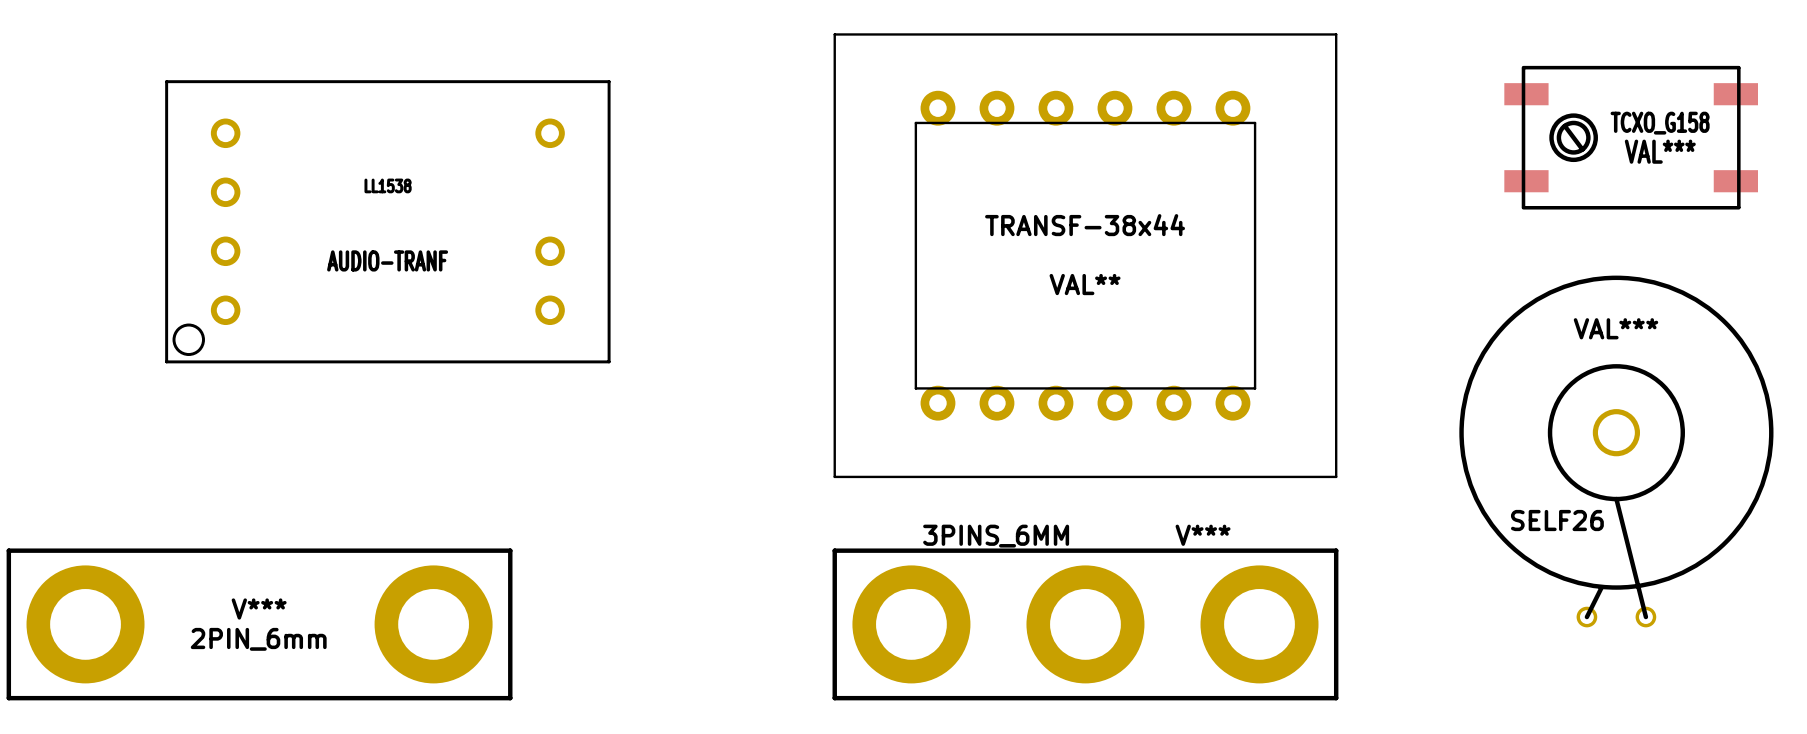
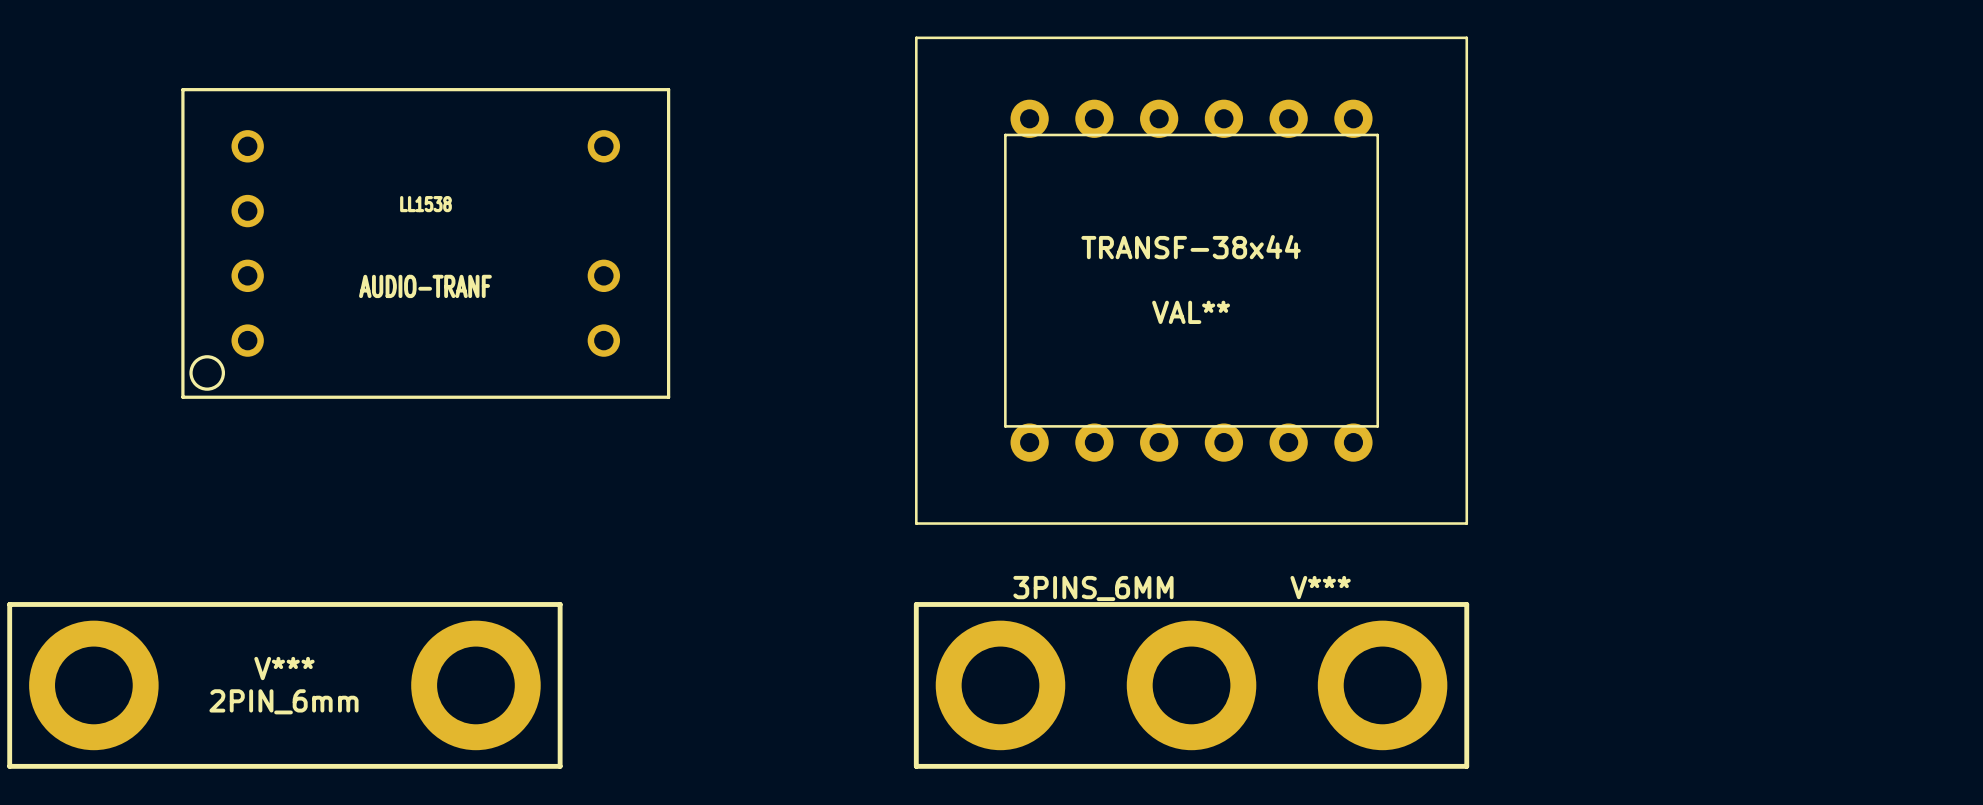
TCXO_G158: VAL*** (1631, 137) -> none
SELF26: VAL*** (1616, 451) -> none

